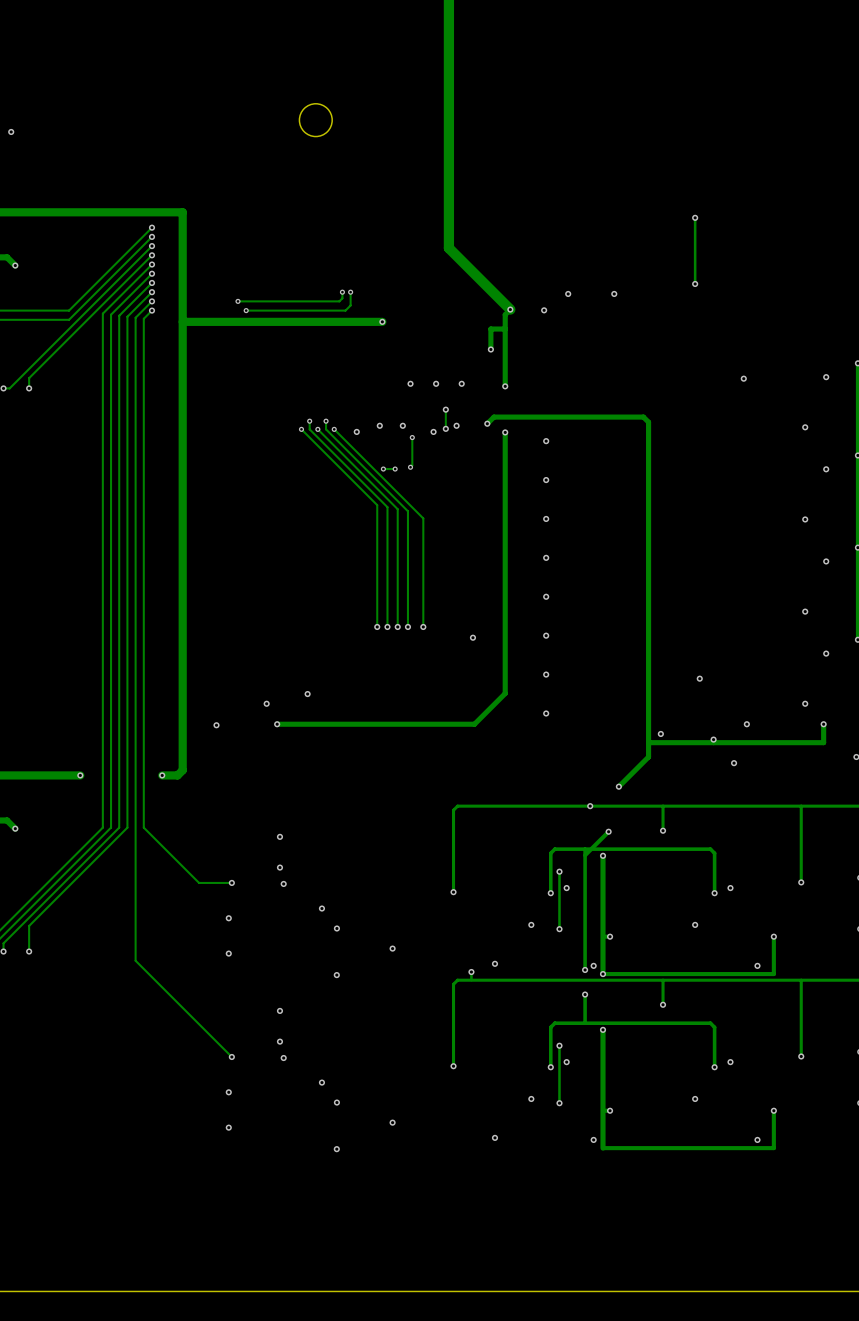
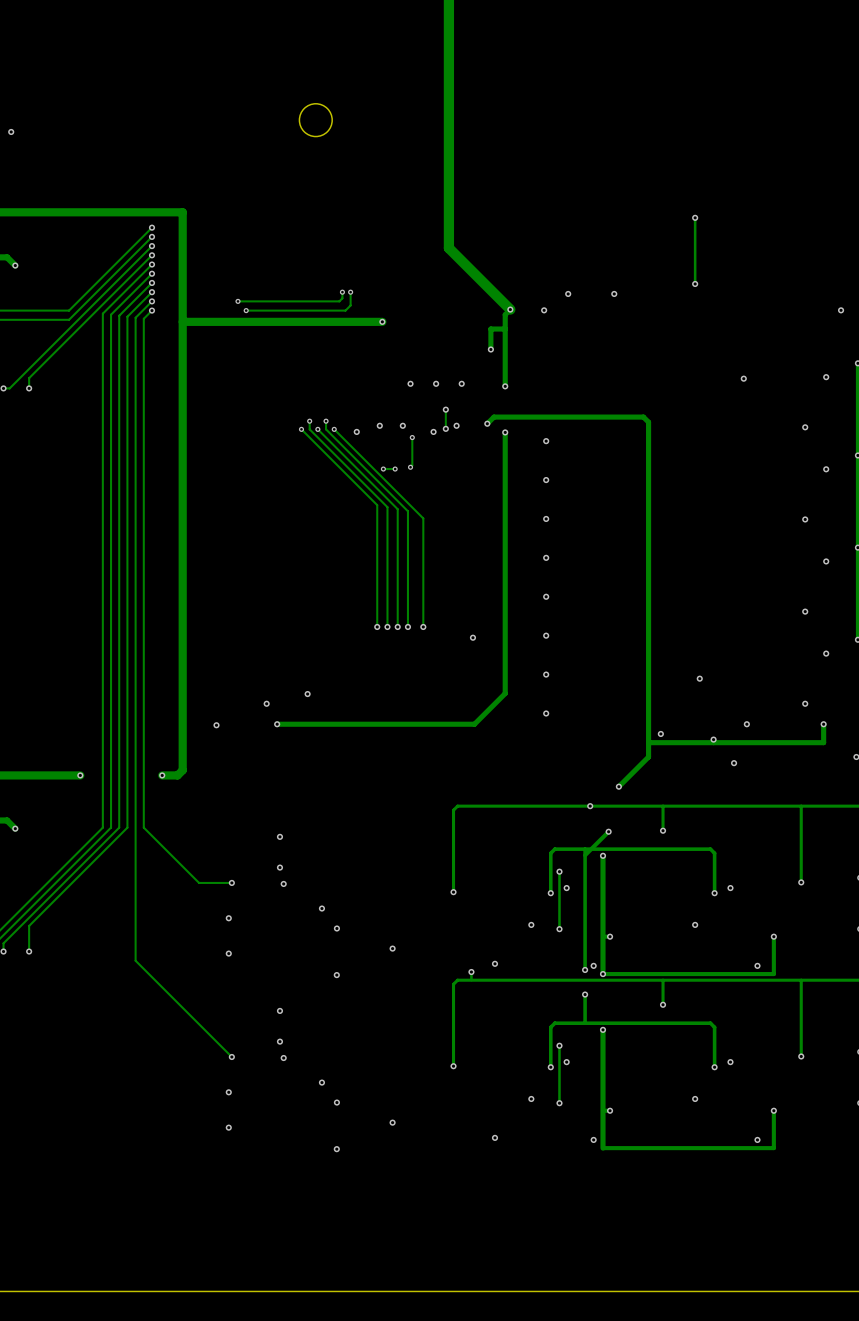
via: none -> (841, 310)

